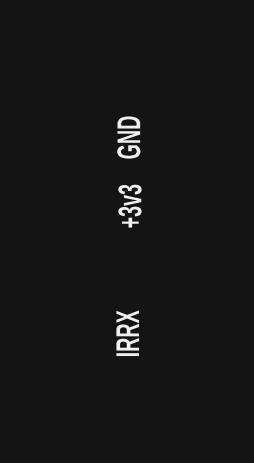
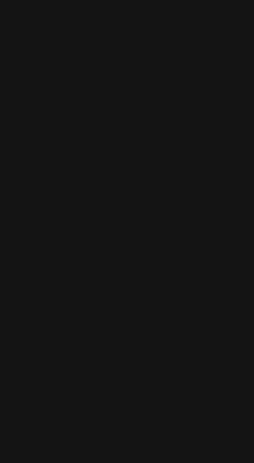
text: GND (128, 137) -> none
text: +3v3 (129, 206) -> none
text: IRRX (127, 333) -> none

